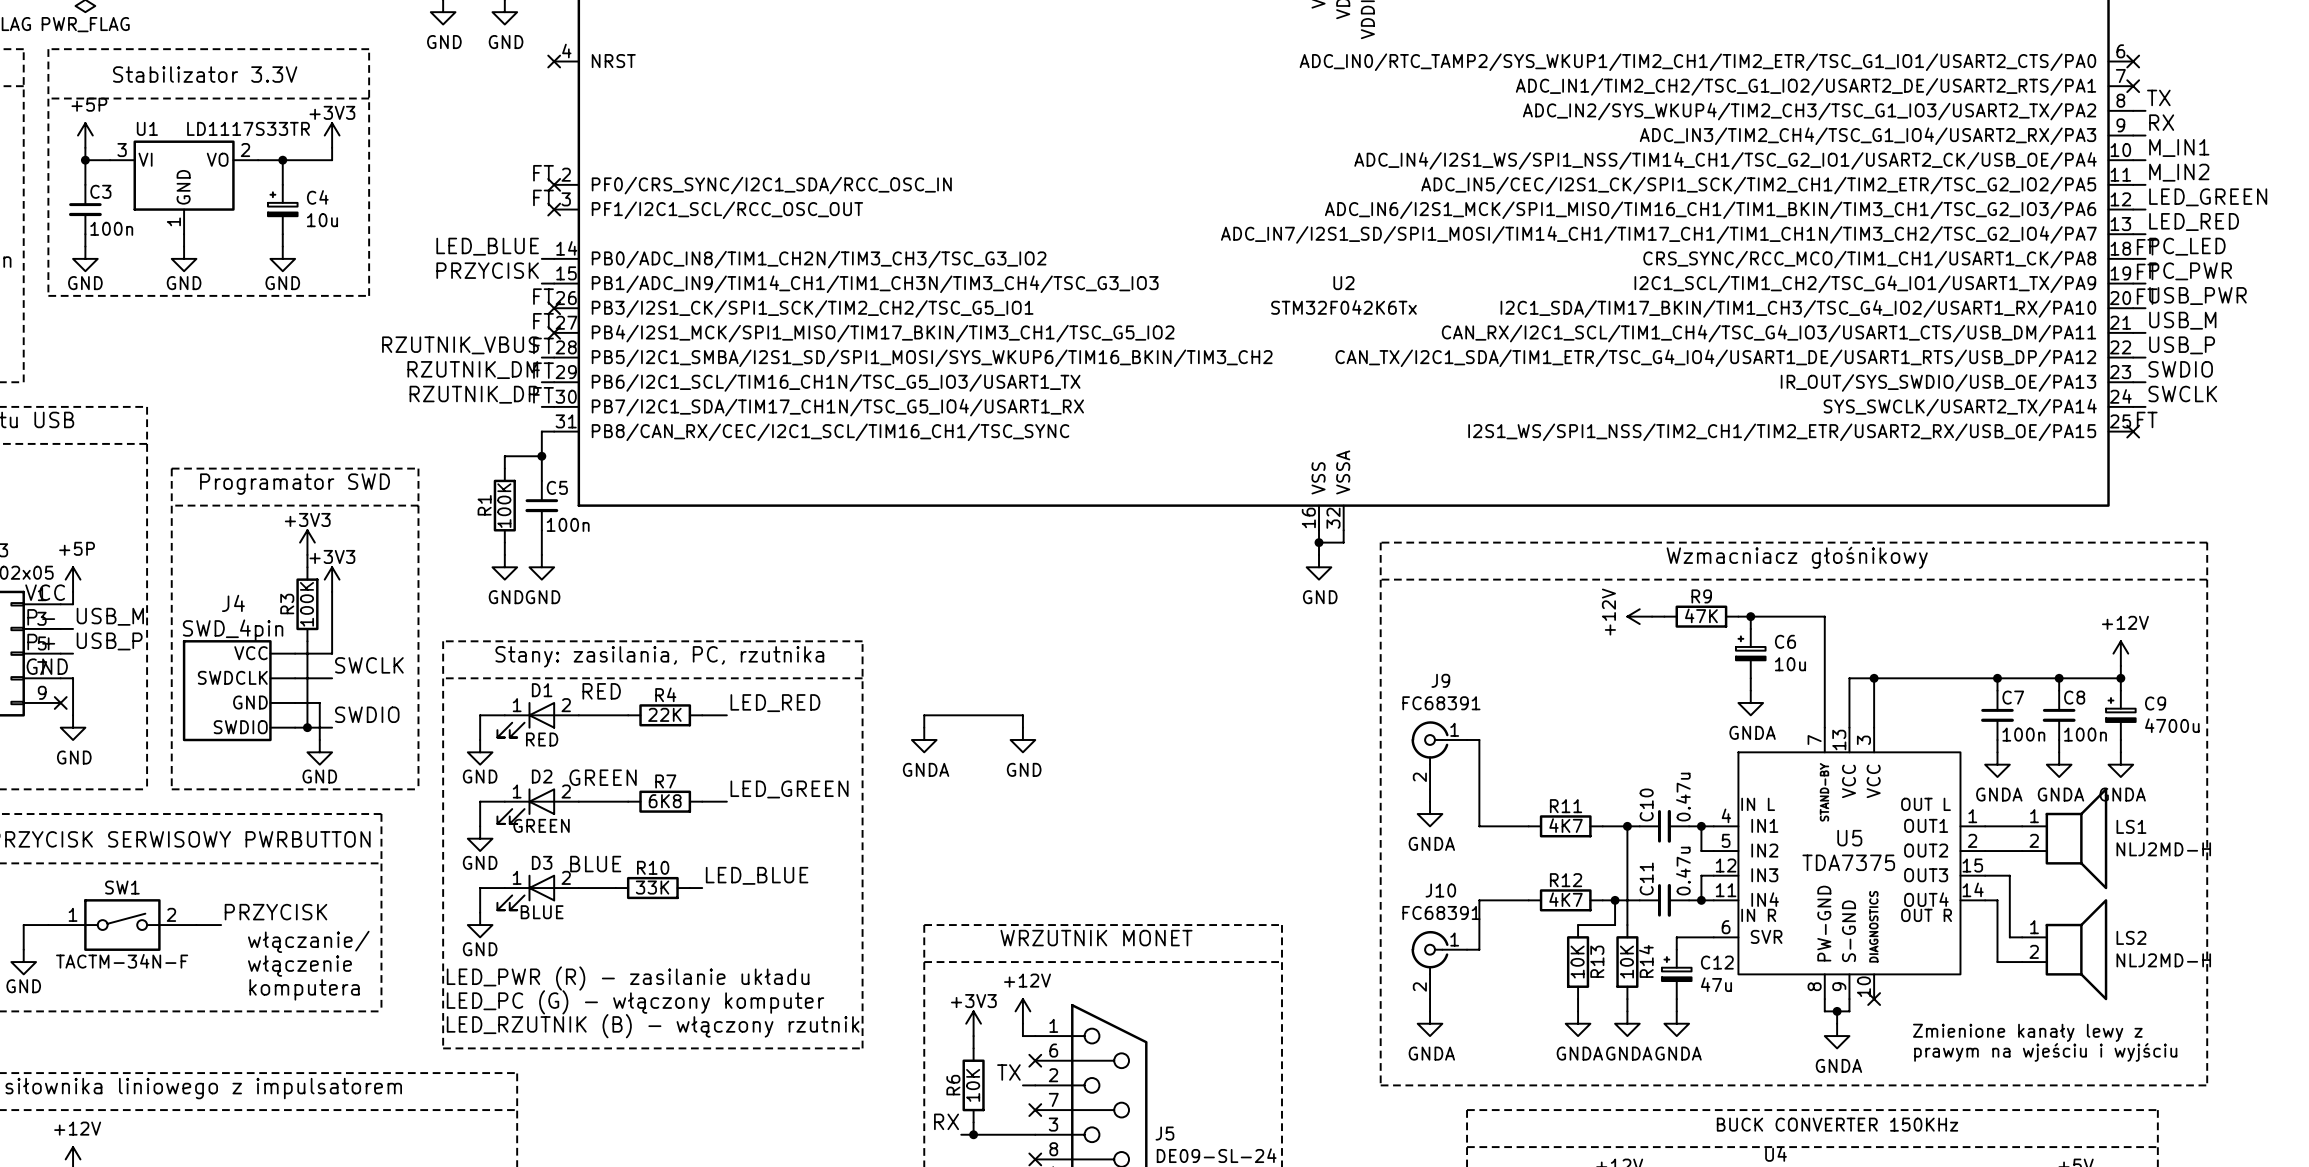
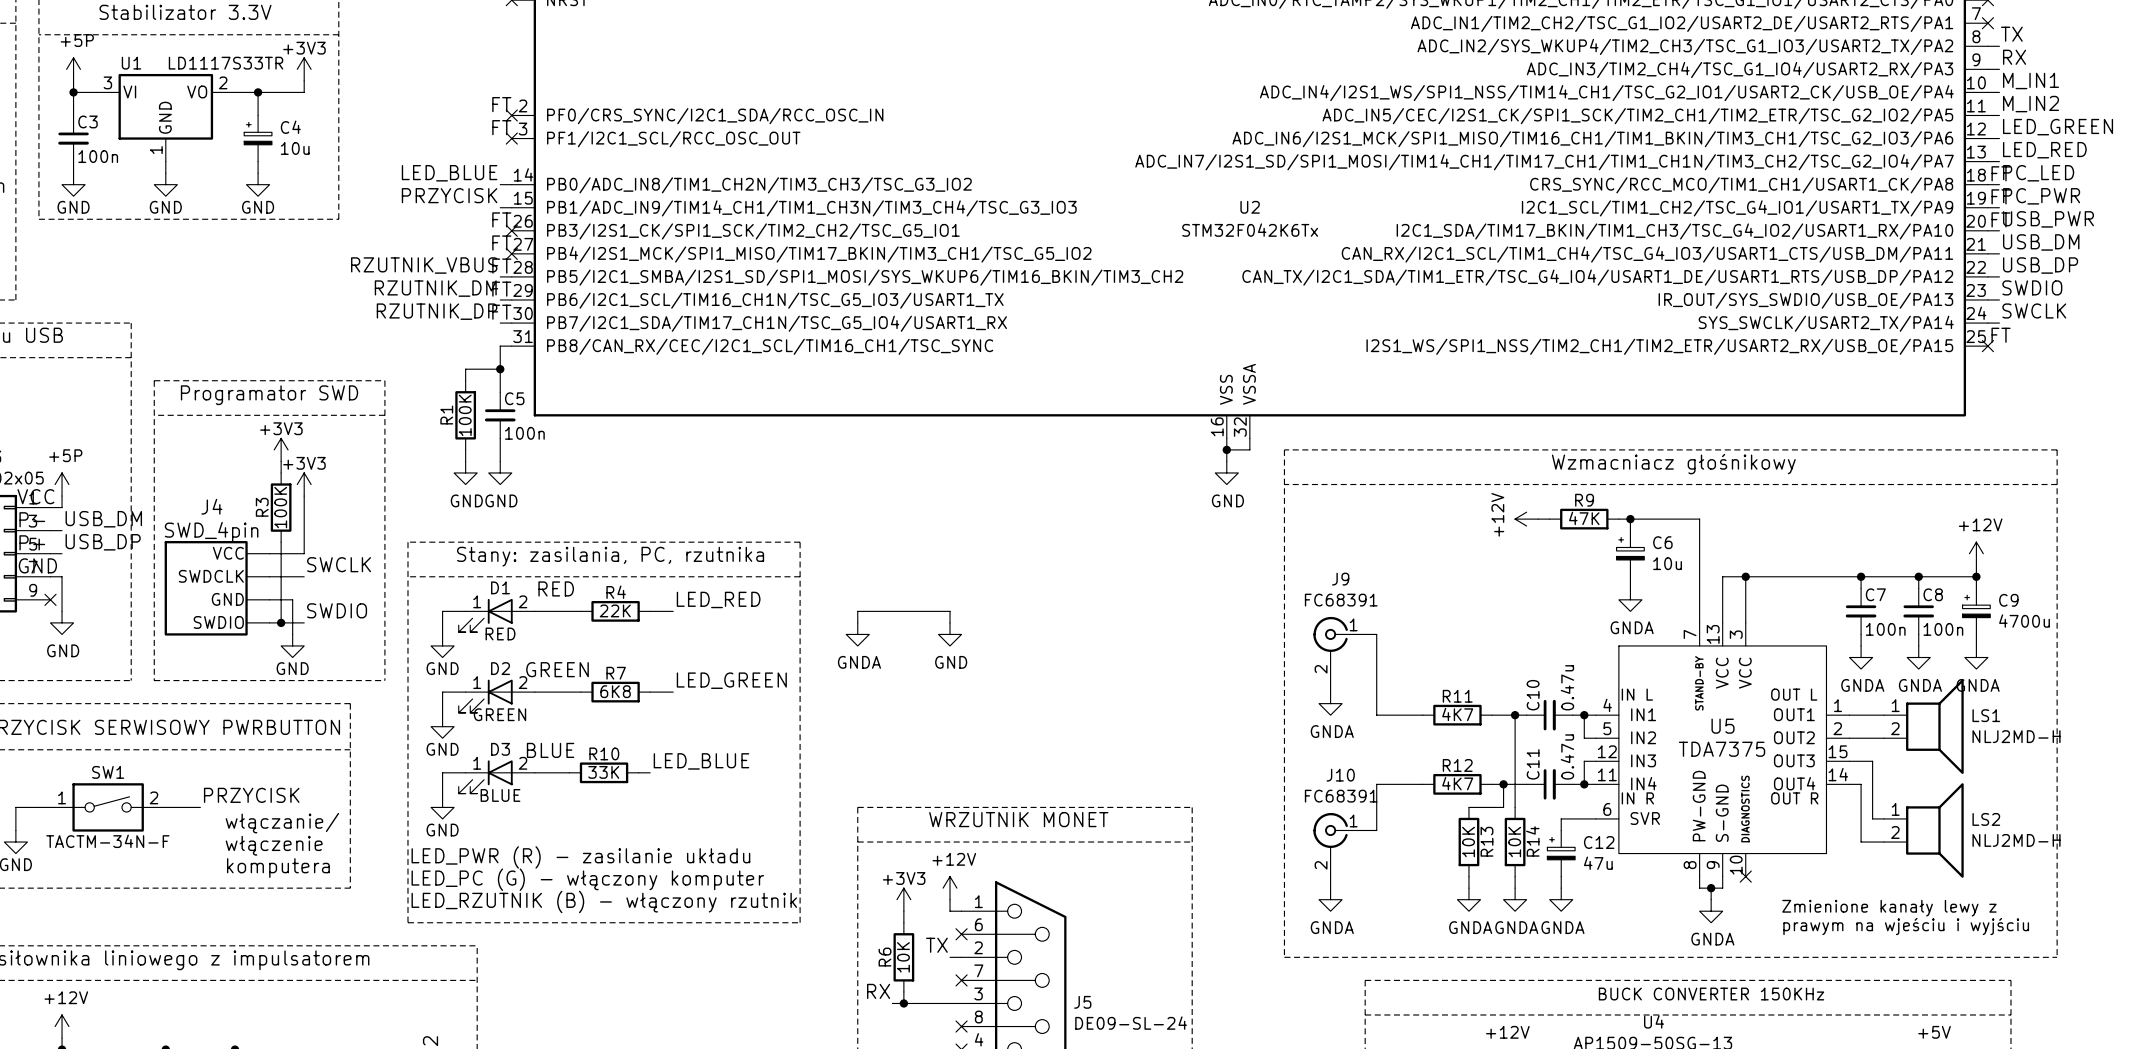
label: USB_M (2182, 320) -> USB_DM (2041, 242)
label: USB_P (2182, 345) -> USB_DP (2040, 265)
label: USB_M (110, 616) -> USB_DM (103, 519)
label: USB_P (109, 641) -> USB_DP (103, 542)

